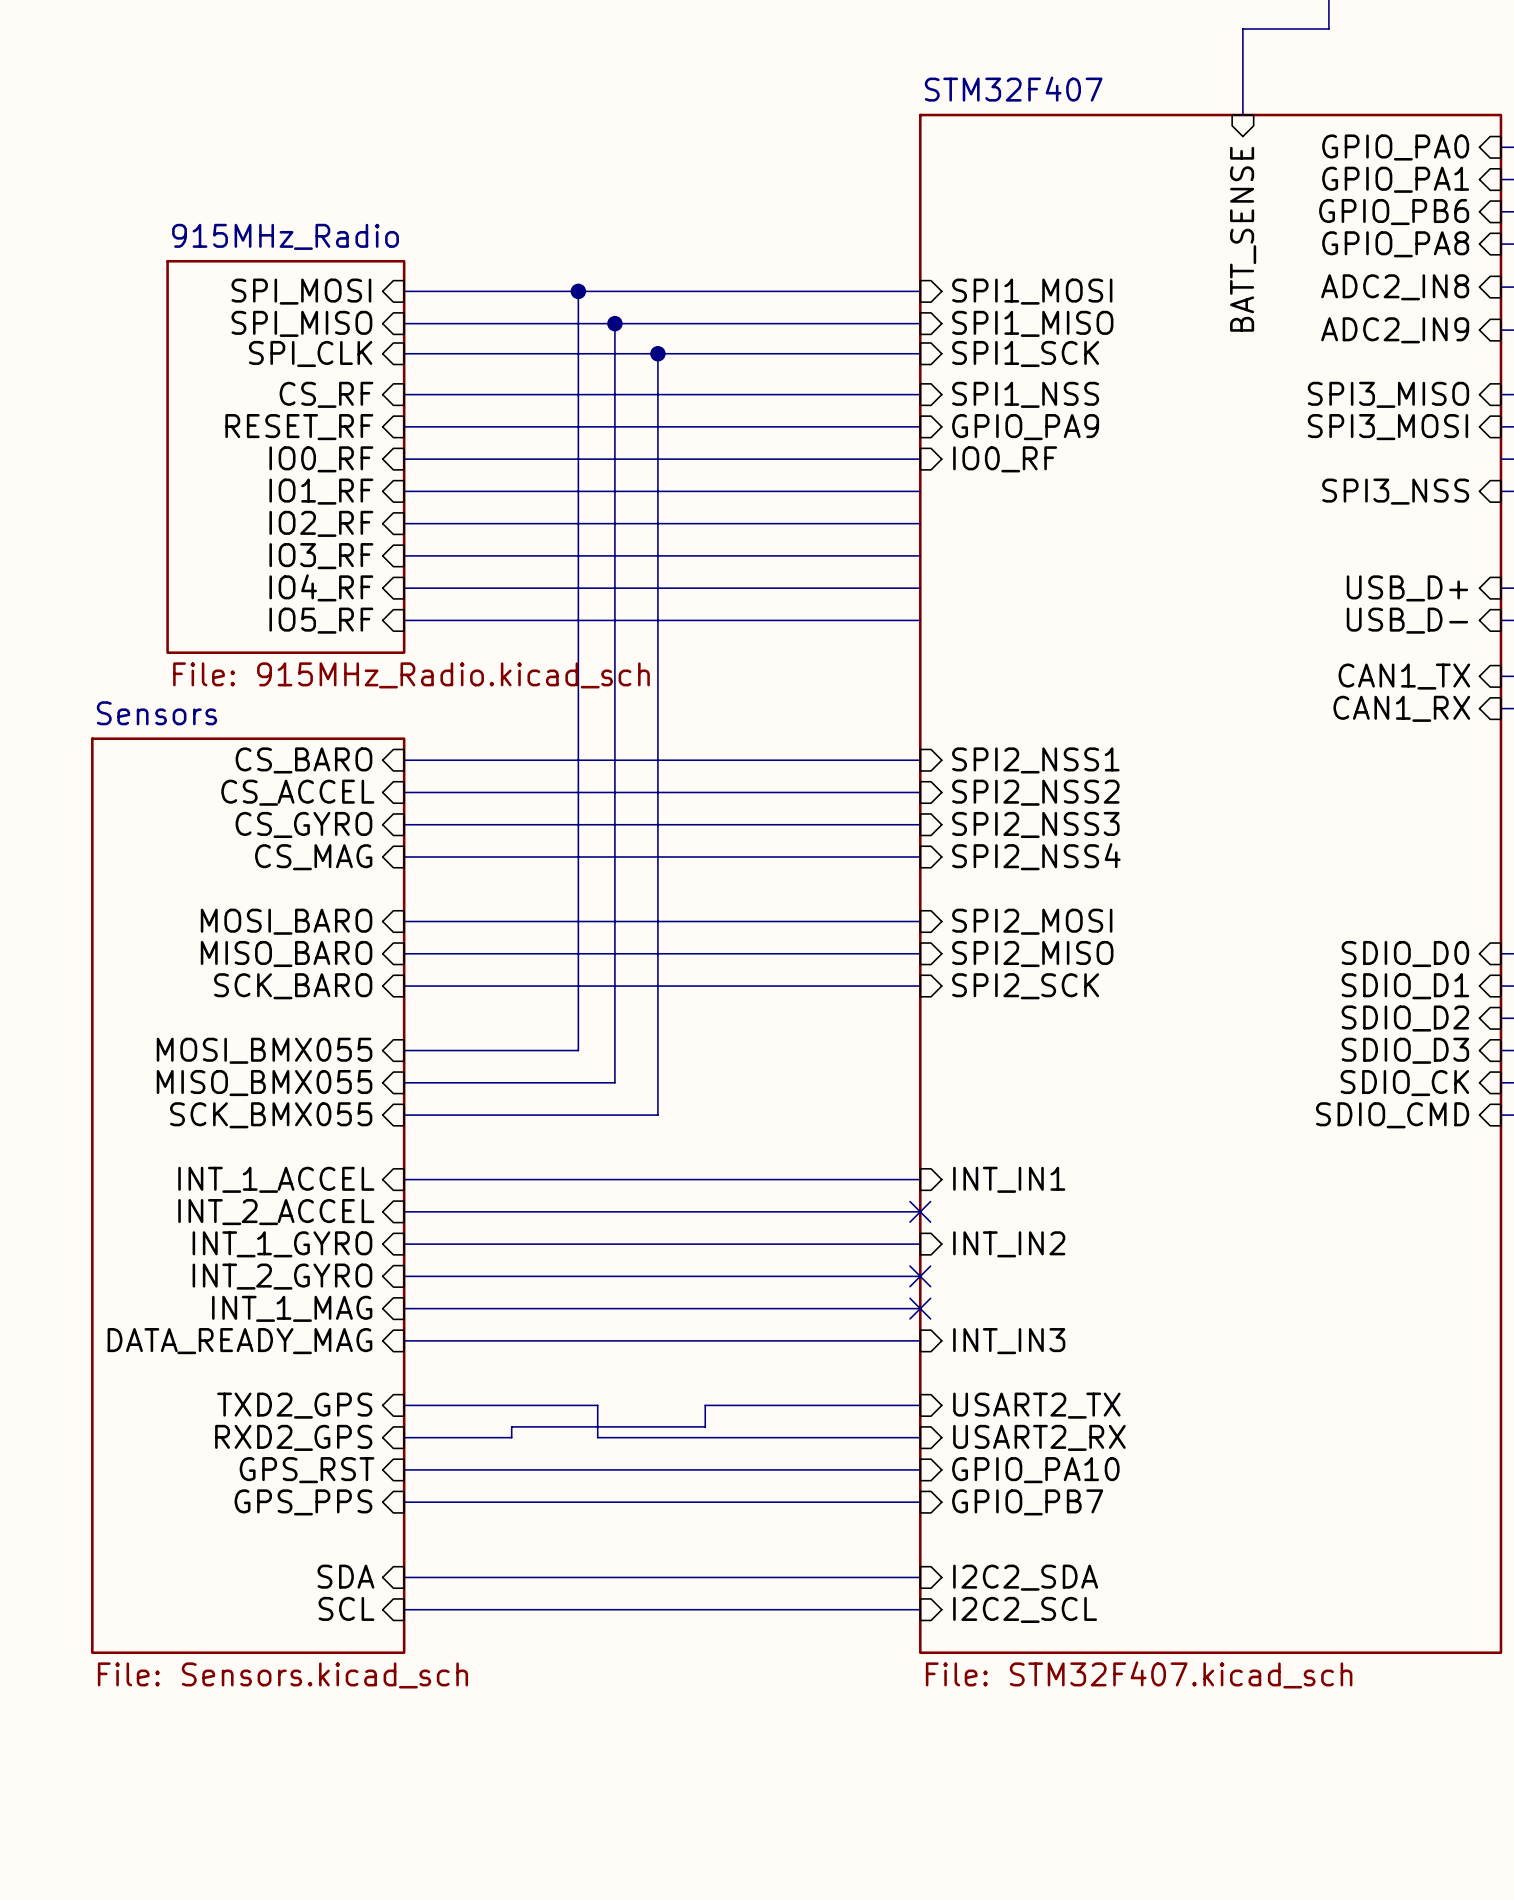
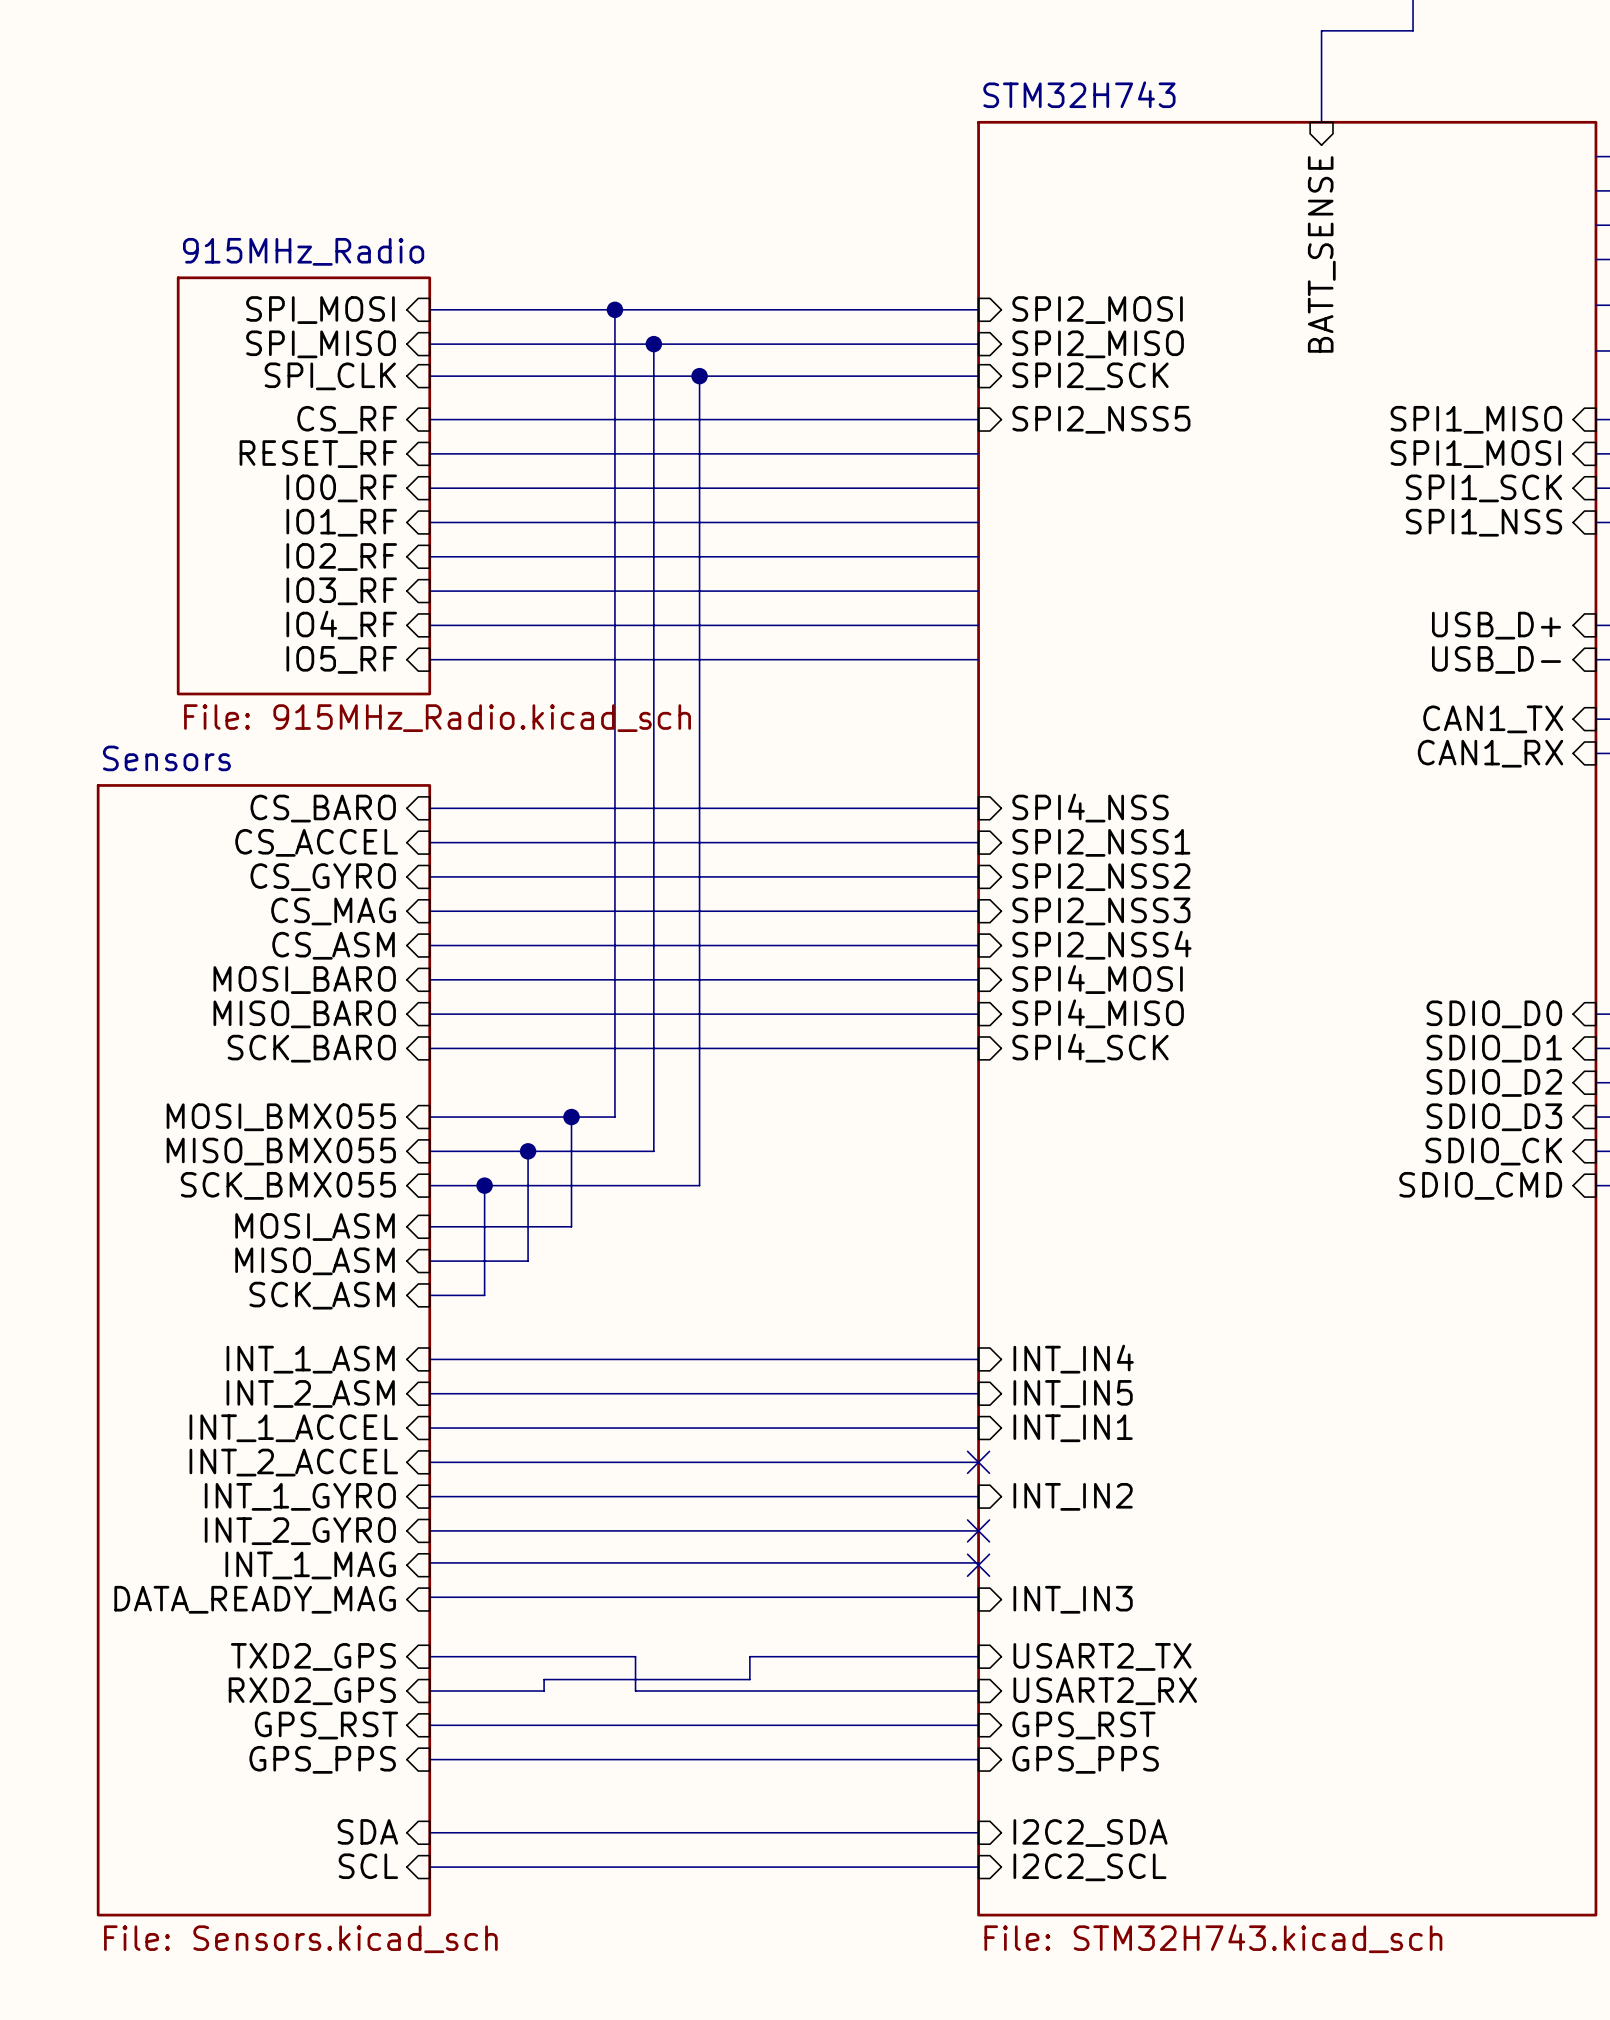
sheet pin: GPIO_PA0 (1395, 147) -> none
sheet pin: GPIO_PA1 (1395, 179) -> none
sheet pin: GPIO_PB6 (1394, 212) -> none
sheet pin: GPIO_PA8 (1395, 244) -> none
sheet pin: ADC2_IN8 (1395, 287) -> none
sheet pin: SPI1_MOSI (1032, 291) -> SPI2_MOSI (1097, 310)
sheet pin: SPI1_MISO (1032, 323) -> SPI2_MISO (1098, 344)
sheet pin: ADC2_IN9 (1395, 330) -> none
sheet pin: SPI1_SCK (1025, 353) -> SPI2_SCK (1090, 376)
sheet pin: SPI1_NSS (1025, 394) -> SPI2_NSS5 (1101, 419)
sheet pin: SPI3_MISO (1388, 394) -> SPI1_MISO (1476, 419)
sheet pin: GPIO_PA9 (1025, 427) -> none
sheet pin: SPI3_MOSI (1387, 427) -> SPI1_MOSI (1475, 454)
sheet pin: IO0_RF (1005, 459) -> none
sheet pin: none -> SPI1_SCK (1483, 488)
sheet pin: SPI3_NSS (1395, 491) -> SPI1_NSS (1483, 522)
sheet pin: SPI2_NSS1 (1035, 760) -> SPI4_NSS (1090, 808)
sheet pin: SPI2_NSS2 (1035, 792) -> SPI2_NSS1 (1101, 842)
sheet pin: SPI2_NSS3 (1035, 824) -> SPI2_NSS2 (1101, 877)
sheet pin: SPI2_NSS4 (1036, 856) -> SPI2_NSS3 (1101, 911)
sheet STM32F407: File: STM32F407.kicad_sch (1210, 883) -> none
sheet pin: none -> SPI2_NSS4 (1101, 945)
sheet pin: none -> CS_ASM (333, 945)
wire: none -> (429, 945) (978, 945)
sheet pin: SPI2_MOSI (1032, 921) -> SPI4_MOSI (1097, 979)
sheet pin: SPI2_MISO (1032, 953) -> SPI4_MISO (1098, 1013)
sheet STM32H743: none -> File: STM32H743.kicad_sch (1287, 1018)
sheet pin: SPI2_SCK (1025, 986) -> SPI4_SCK (1090, 1048)
wire: none -> (571, 1117) (571, 1226) (429, 1226)
junction: none -> (571, 1117)
wire: none -> (528, 1151) (528, 1261) (429, 1261)
junction: none -> (528, 1151)
wire: none -> (484, 1185) (484, 1295) (429, 1295)
junction: none -> (484, 1185)
sheet pin: none -> MOSI_ASM (315, 1227)
sheet pin position: INT_1_ACCEL (276, 1179) -> INT_1_ACCEL (293, 1428)
wire: (404, 1179) (920, 1179) -> (429, 1359) (978, 1359)
sheet pin position: INT_IN1 (1009, 1179) -> INT_IN1 (1073, 1428)
sheet pin: none -> MISO_ASM (315, 1261)
sheet Sensors: File: Sensors.kicad_sch (248, 1195) -> none
wire: (404, 1211) (920, 1211) -> (429, 1393) (978, 1393)
no-connect mark: (920, 1211) -> none
sheet pin position: INT_2_ACCEL (276, 1212) -> INT_2_ACCEL (293, 1462)
sheet pin: none -> SCK_ASM (322, 1295)
sheet pin position: INT_1_GYRO (282, 1244) -> INT_1_GYRO (300, 1496)
wire: (404, 1244) (920, 1244) -> (429, 1428) (978, 1428)
sheet pin position: INT_IN2 (1009, 1244) -> INT_IN2 (1073, 1496)
sheet Sensors: none -> File: Sensors.kicad_sch (263, 1350)
sheet pin position: INT_2_GYRO (282, 1276) -> INT_2_GYRO (300, 1531)
wire: (404, 1276) (920, 1276) -> (429, 1462) (978, 1462)
no-connect mark: (920, 1276) -> none
sheet pin: none -> INT_1_ASM (310, 1359)
sheet pin: none -> INT_IN4 (1073, 1359)
sheet pin position: INT_1_MAG (292, 1308) -> INT_1_MAG (310, 1565)
wire: (404, 1308) (920, 1308) -> (429, 1496) (978, 1496)
no-connect mark: (920, 1308) -> none
sheet pin: none -> INT_2_ASM (310, 1393)
sheet pin: none -> INT_IN5 (1073, 1393)
wire: (404, 1340) (920, 1340) -> (429, 1530) (978, 1530)
sheet pin position: DATA_READY_MAG (239, 1341) -> DATA_READY_MAG (255, 1599)
sheet pin position: INT_IN3 (1009, 1341) -> INT_IN3 (1073, 1599)
no-connect mark: none -> (978, 1462)
sheet pin position: TXD2_GPS (294, 1405) -> TXD2_GPS (313, 1656)
wire: (404, 1405) (597, 1405) (597, 1437) (920, 1437) -> (429, 1656) (635, 1656) (635, 1691) (978, 1691)
wire: (920, 1405) (705, 1405) (705, 1426) (511, 1426) (511, 1437) (404, 1437) -> (978, 1656) (749, 1656) (749, 1679) (544, 1679) (544, 1691) (429, 1691)
sheet pin position: USART2_TX (1036, 1405) -> USART2_TX (1102, 1656)
sheet pin position: RXD2_GPS (293, 1437) -> RXD2_GPS (312, 1691)
sheet pin position: USART2_RX (1039, 1437) -> USART2_RX (1105, 1691)
no-connect mark: none -> (978, 1530)
sheet pin position: GPS_RST (307, 1470) -> GPS_RST (326, 1725)
sheet pin: GPIO_PA10 (1035, 1470) -> none
no-connect mark: none -> (978, 1565)
sheet pin position: GPS_PPS (303, 1502) -> GPS_PPS (322, 1759)
sheet pin: GPIO_PB7 (1027, 1502) -> none
sheet pin position: SDA (345, 1576) -> SDA (367, 1831)
wire: (404, 1577) (920, 1577) -> (429, 1725) (978, 1725)
sheet pin position: I2C2_SDA (1025, 1577) -> I2C2_SDA (1090, 1833)
sheet pin position: SCL (346, 1608) -> SCL (368, 1866)
wire: (404, 1609) (920, 1609) -> (429, 1759) (978, 1759)
sheet pin position: I2C2_SCL (1025, 1609) -> I2C2_SCL (1089, 1867)
sheet pin: none -> GPS_RST (1083, 1725)
sheet pin: none -> GPS_PPS (1085, 1759)
wire: none -> (429, 1832) (978, 1832)
wire: none -> (429, 1867) (978, 1867)

